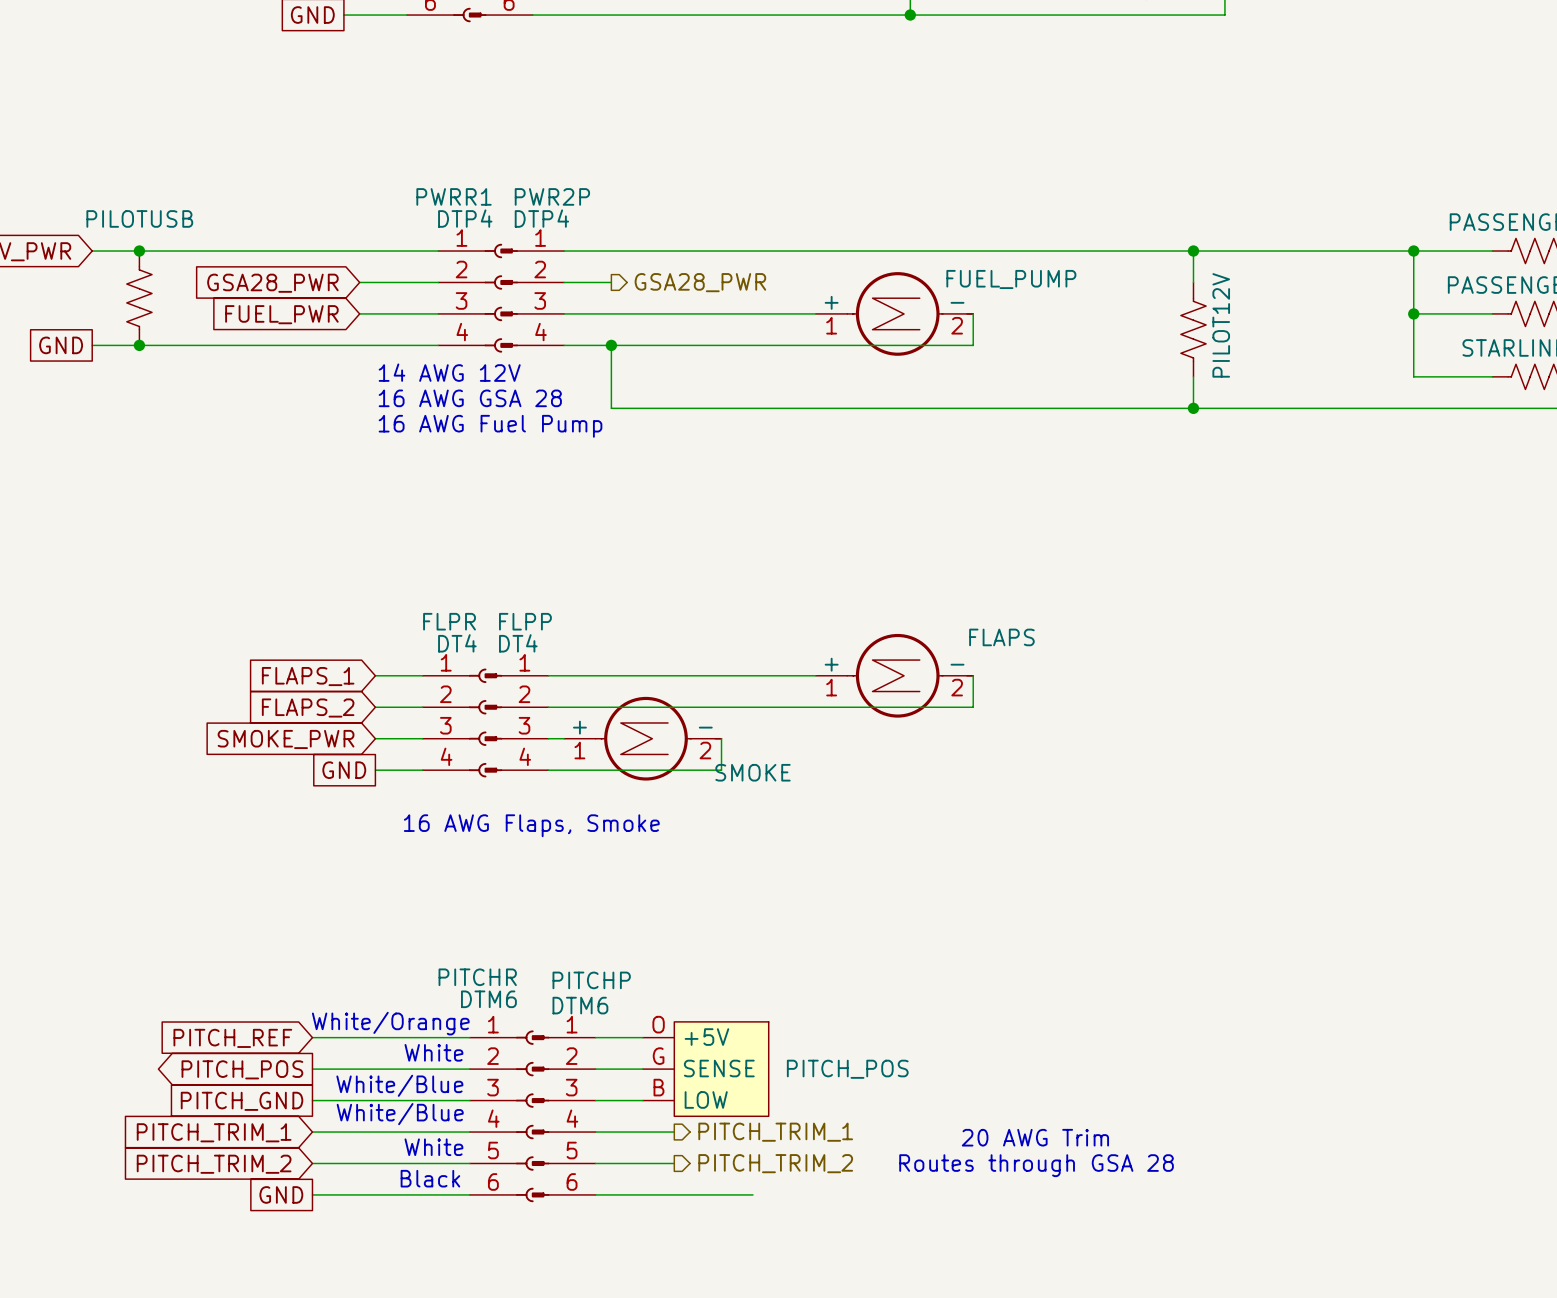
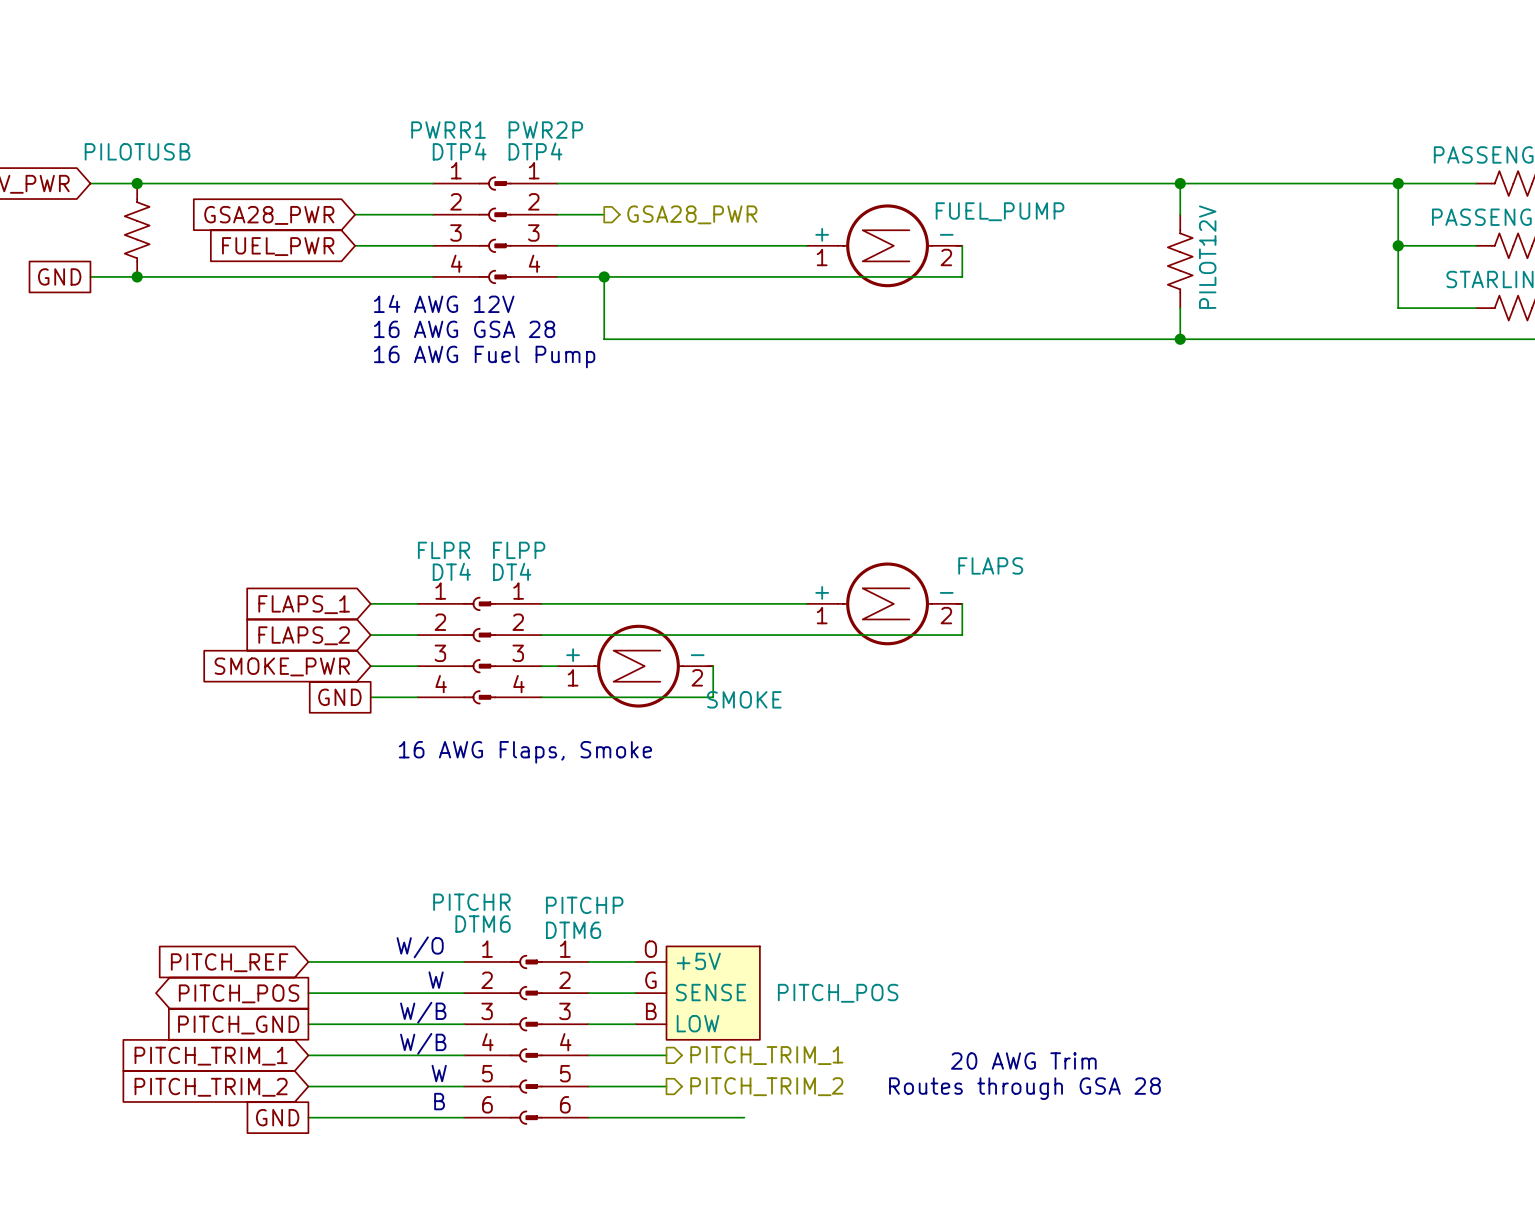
text: none -> W/O (420, 947)
text: White/Orange (390, 1023) -> none
text: White (433, 1052) -> none
text: none -> W (436, 980)
text: White/Blue (399, 1085) -> none
text: none -> W/B (423, 1012)
text: White/Blue (400, 1114) -> none
text: none -> W/B (423, 1043)
text: White (433, 1147) -> none
text: none -> W (439, 1073)
text: Black (430, 1178) -> none
text: none -> B (439, 1101)

